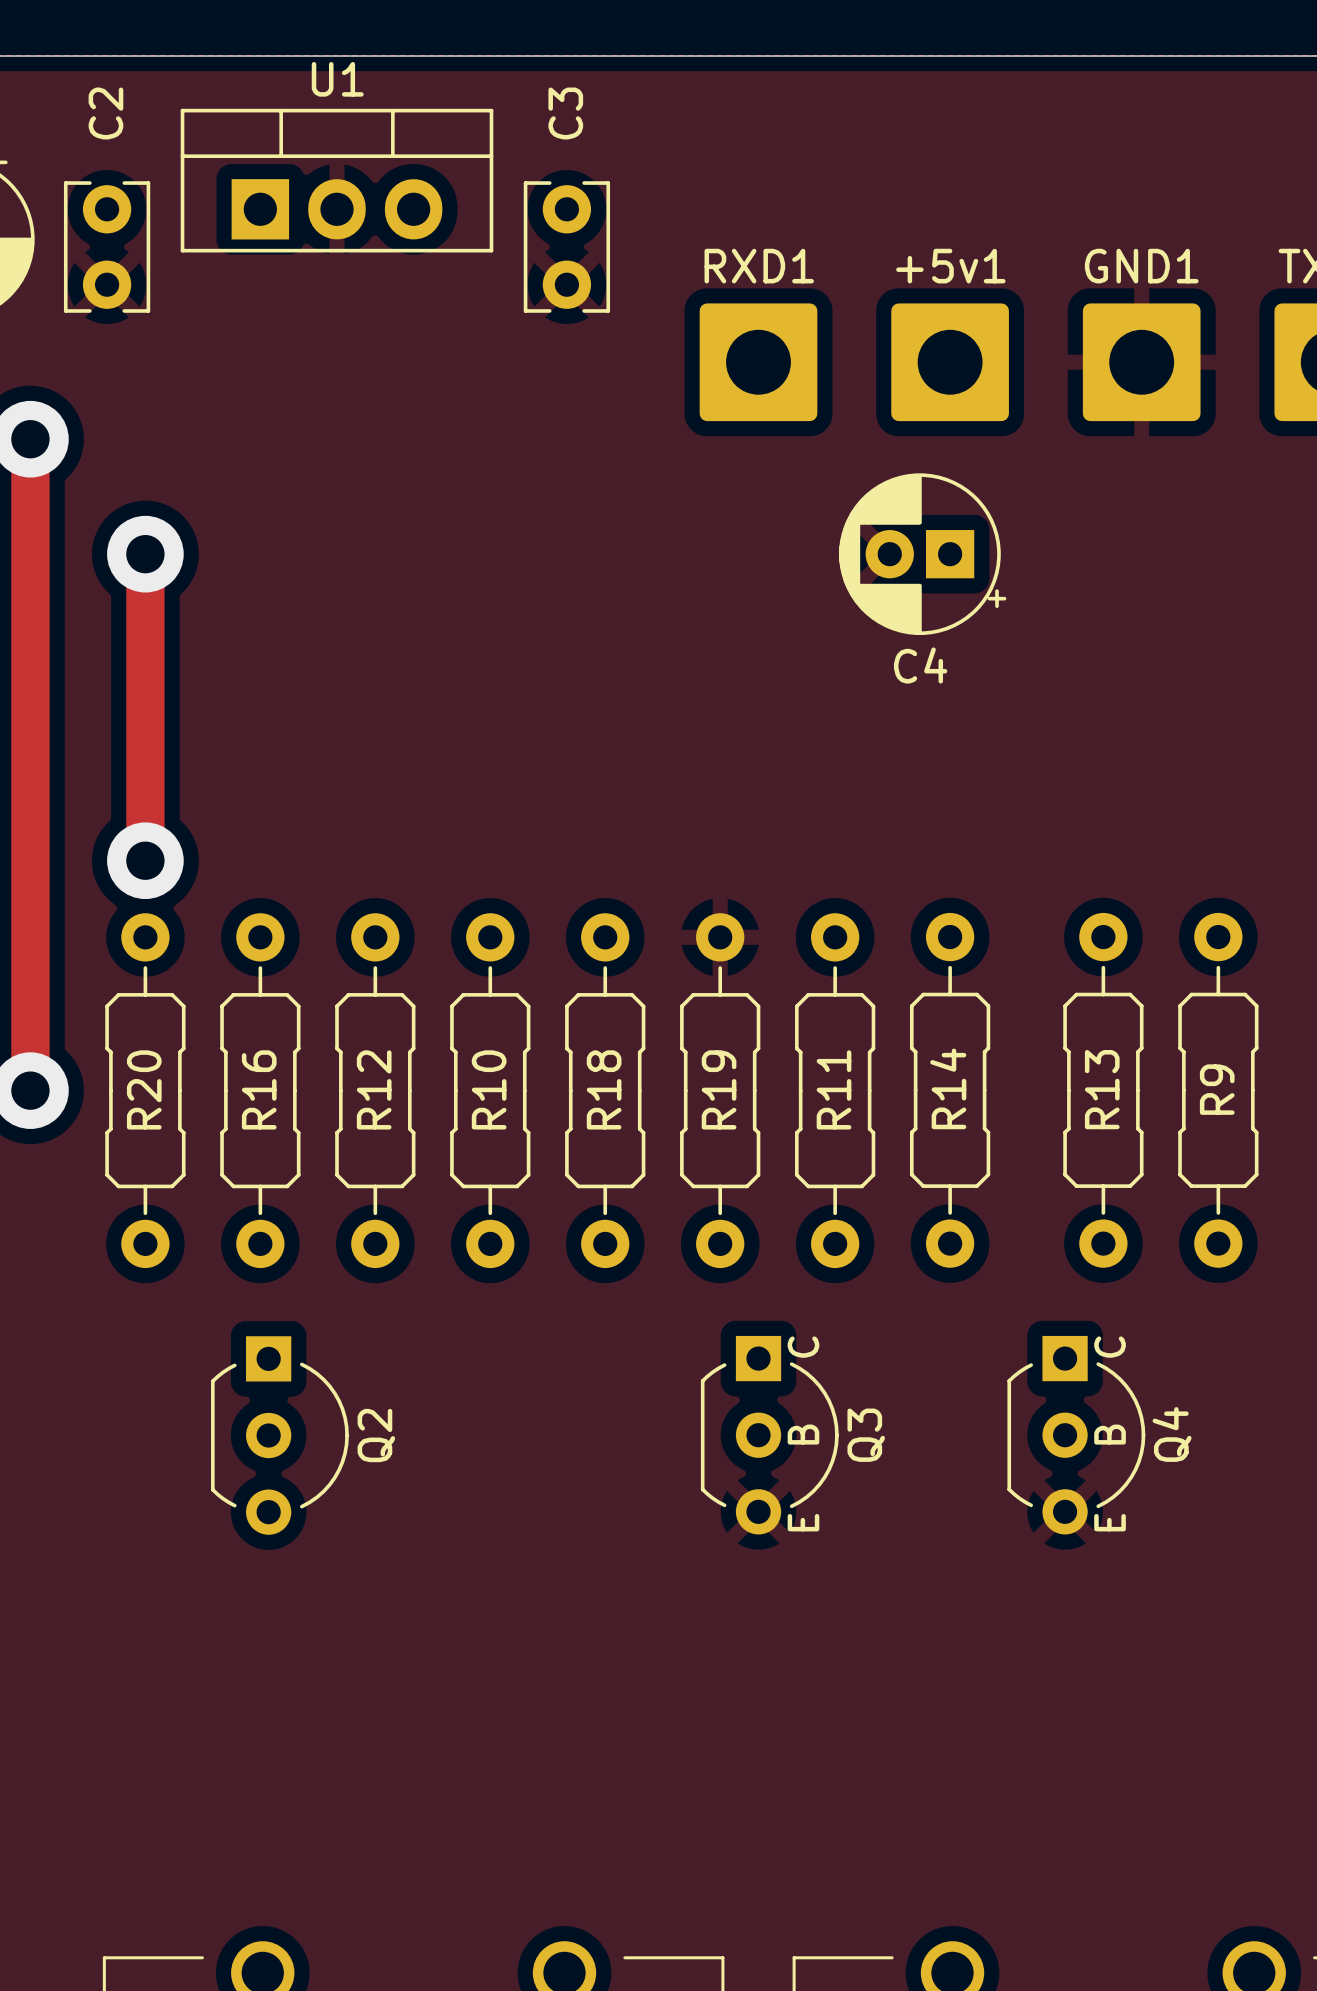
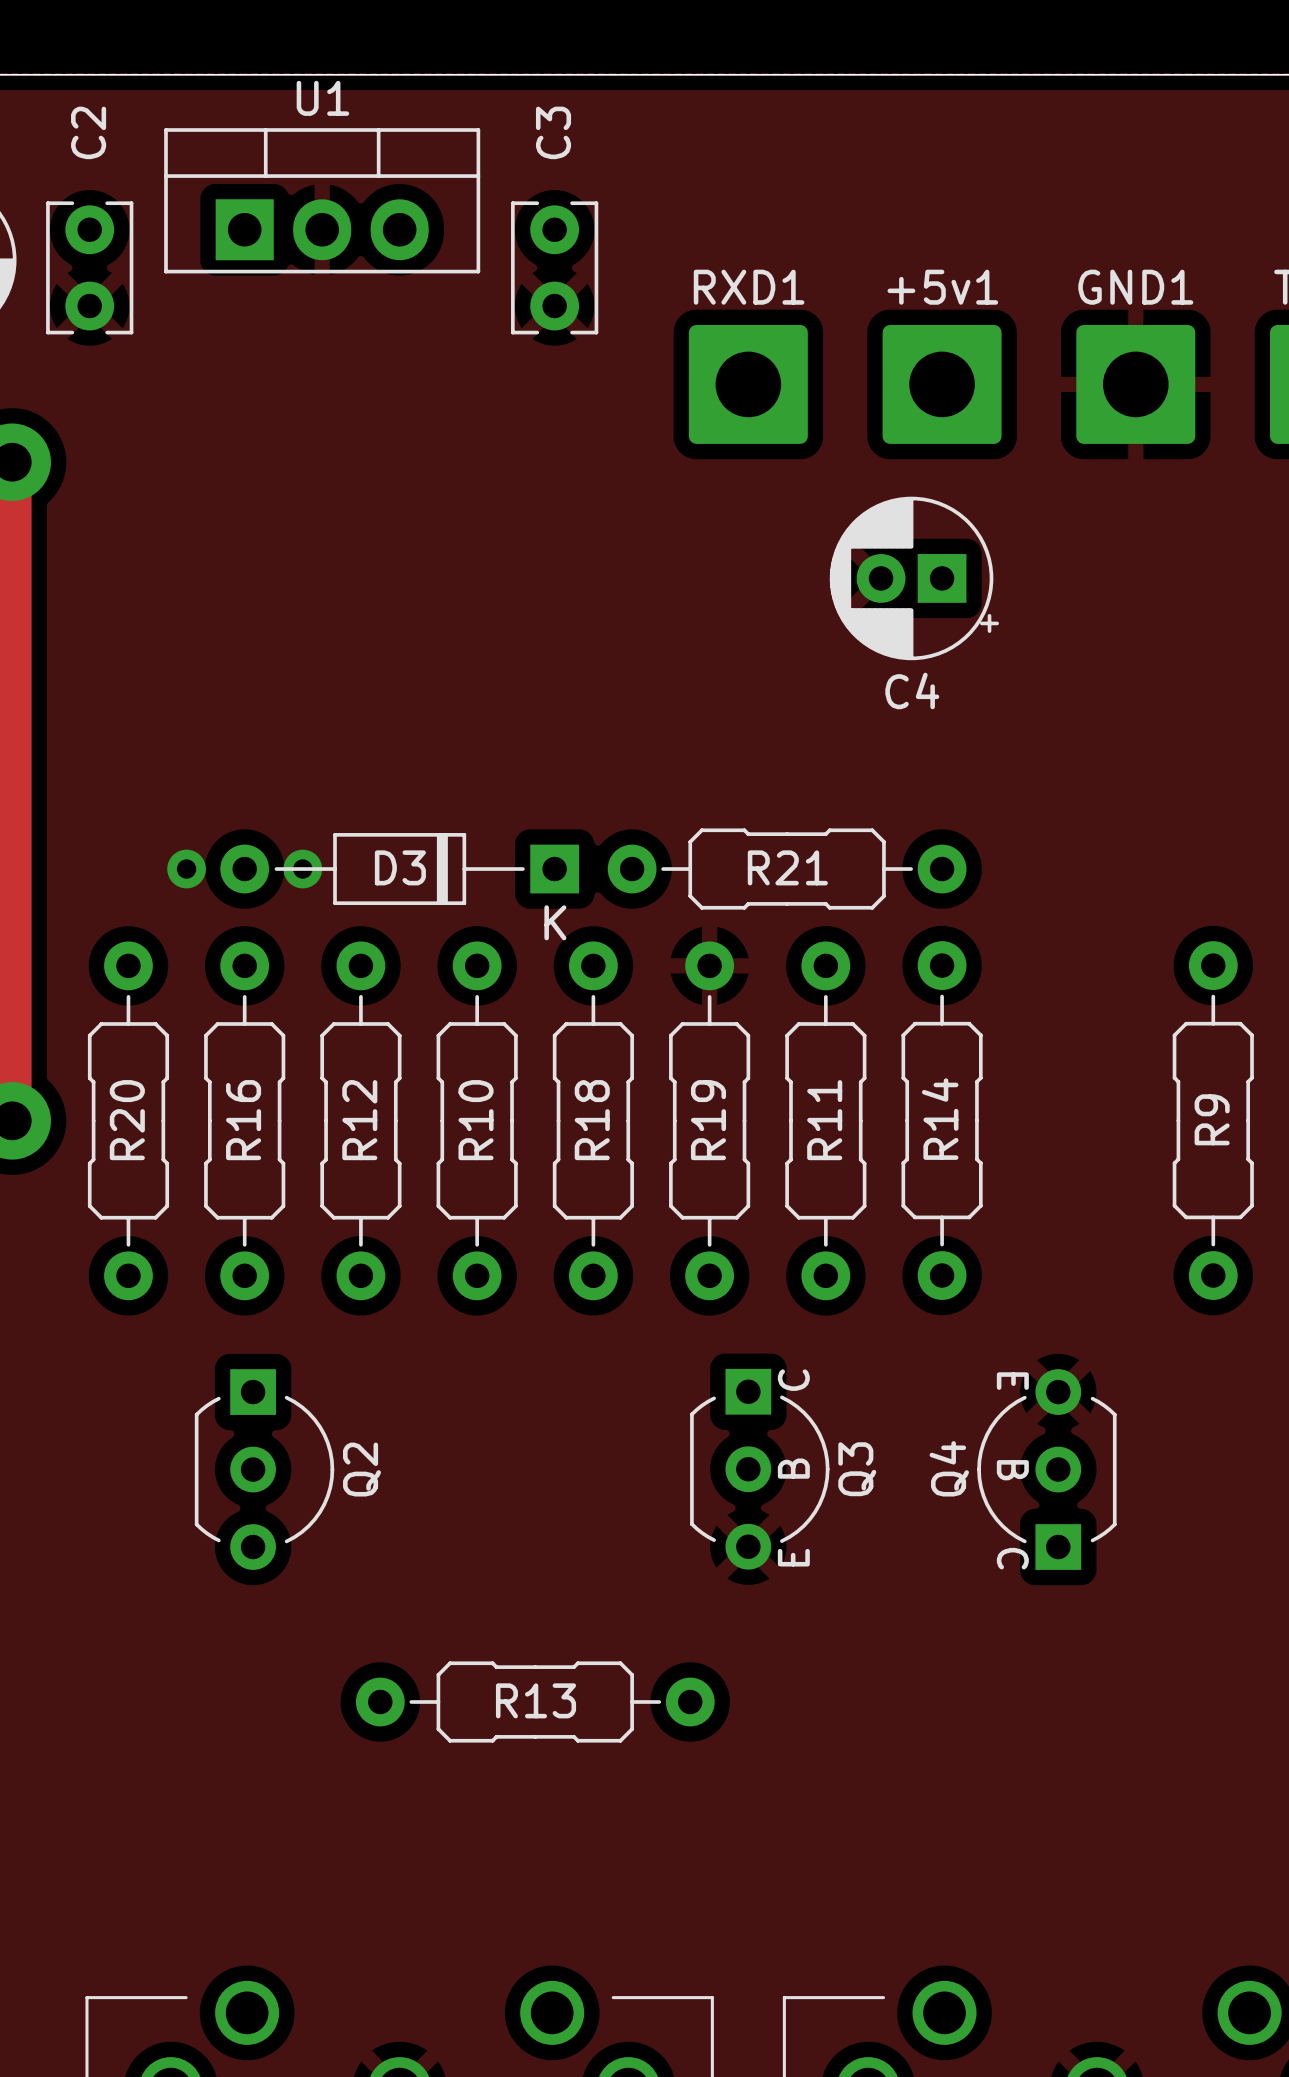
track: (145, 554) (145, 860) -> none
via: (145, 554) -> none
via: none -> (186, 869)
via: none -> (302, 869)
D3: none -> (399, 869)
R21: none -> (787, 869)
via: (145, 860) -> none
R13 rotation: 0° (1103, 1090) -> 90° clockwise (535, 1702)
R13 position: (1103, 1090) -> (535, 1702)
Q4 rotation: 0° (1076, 1435) -> 180° (1046, 1469)

